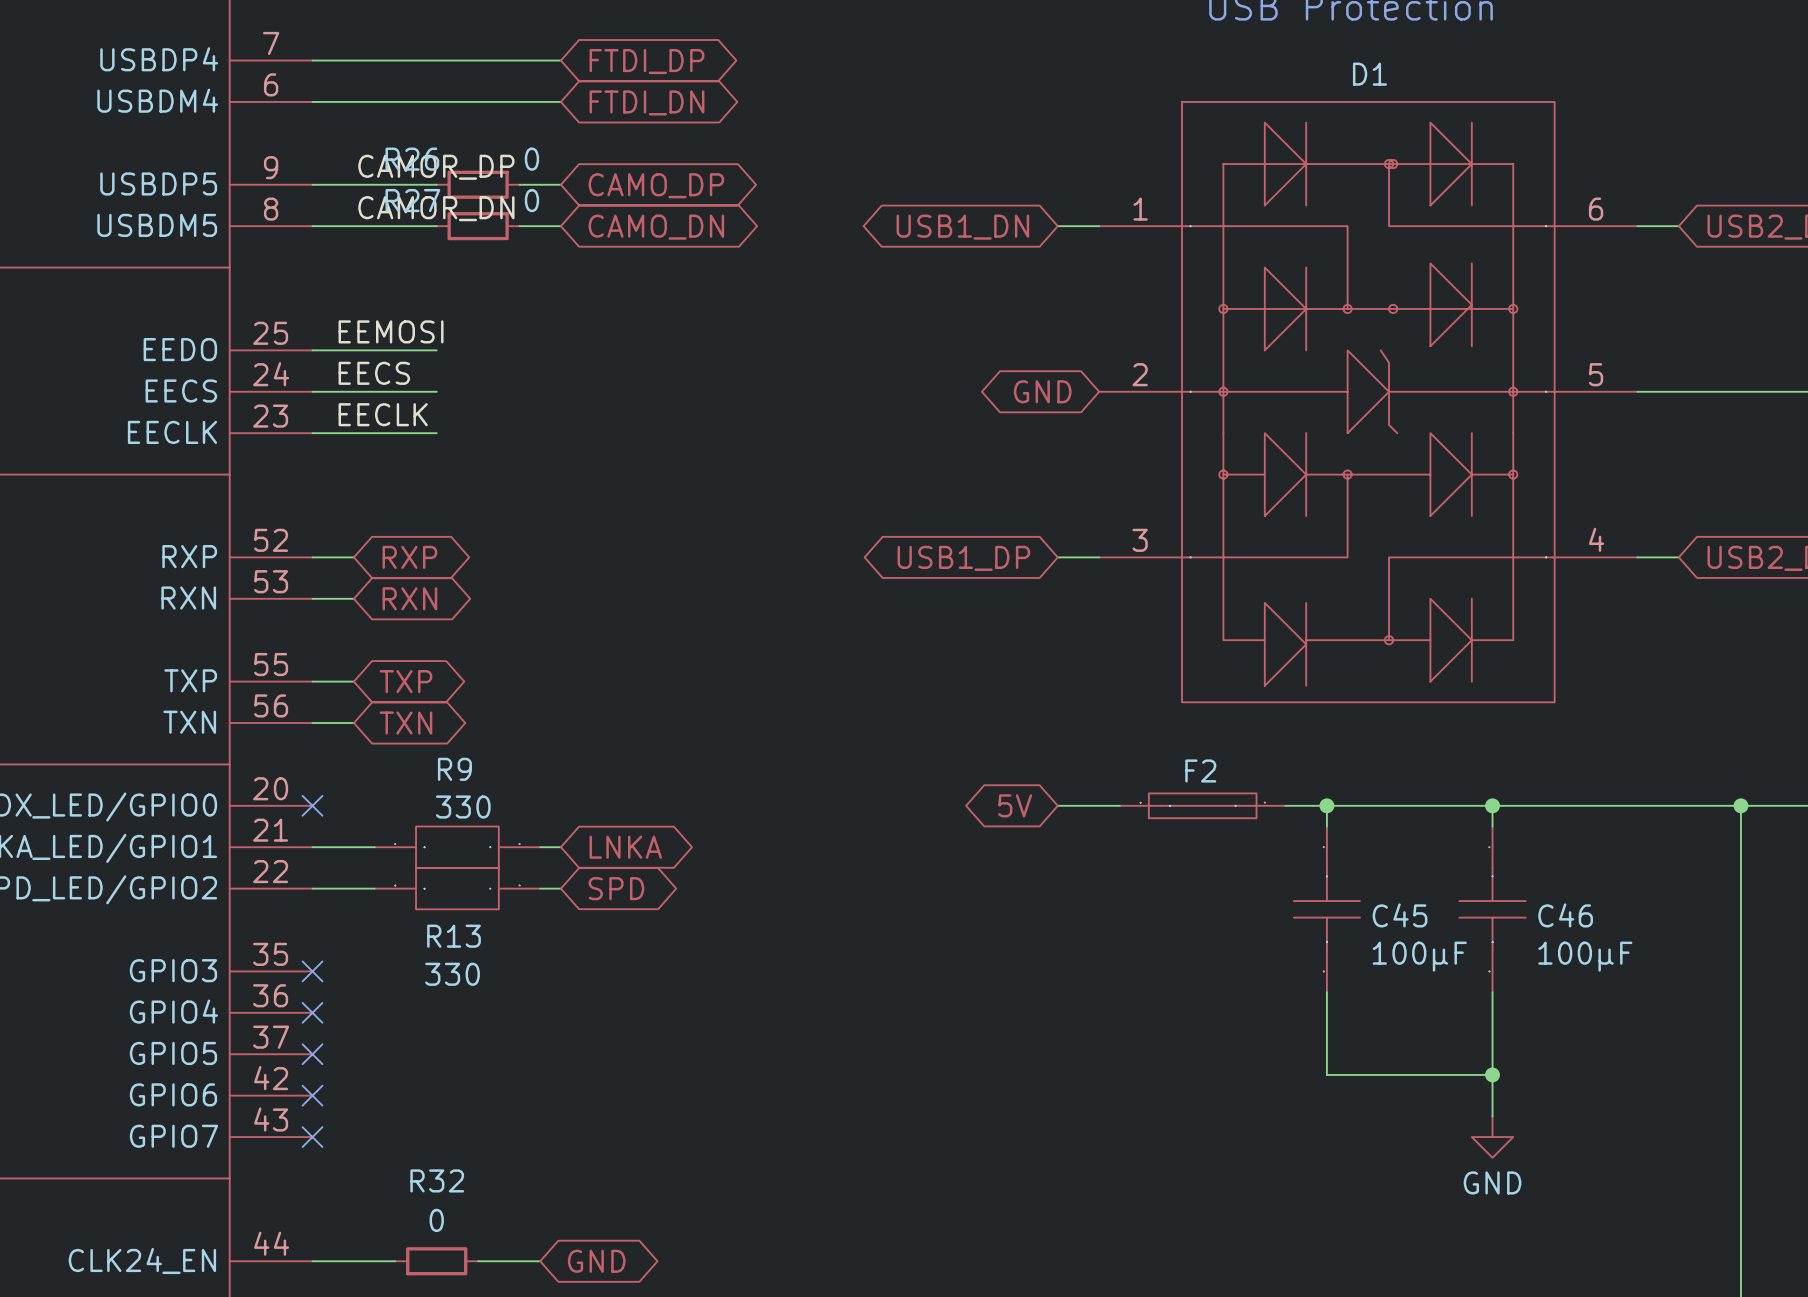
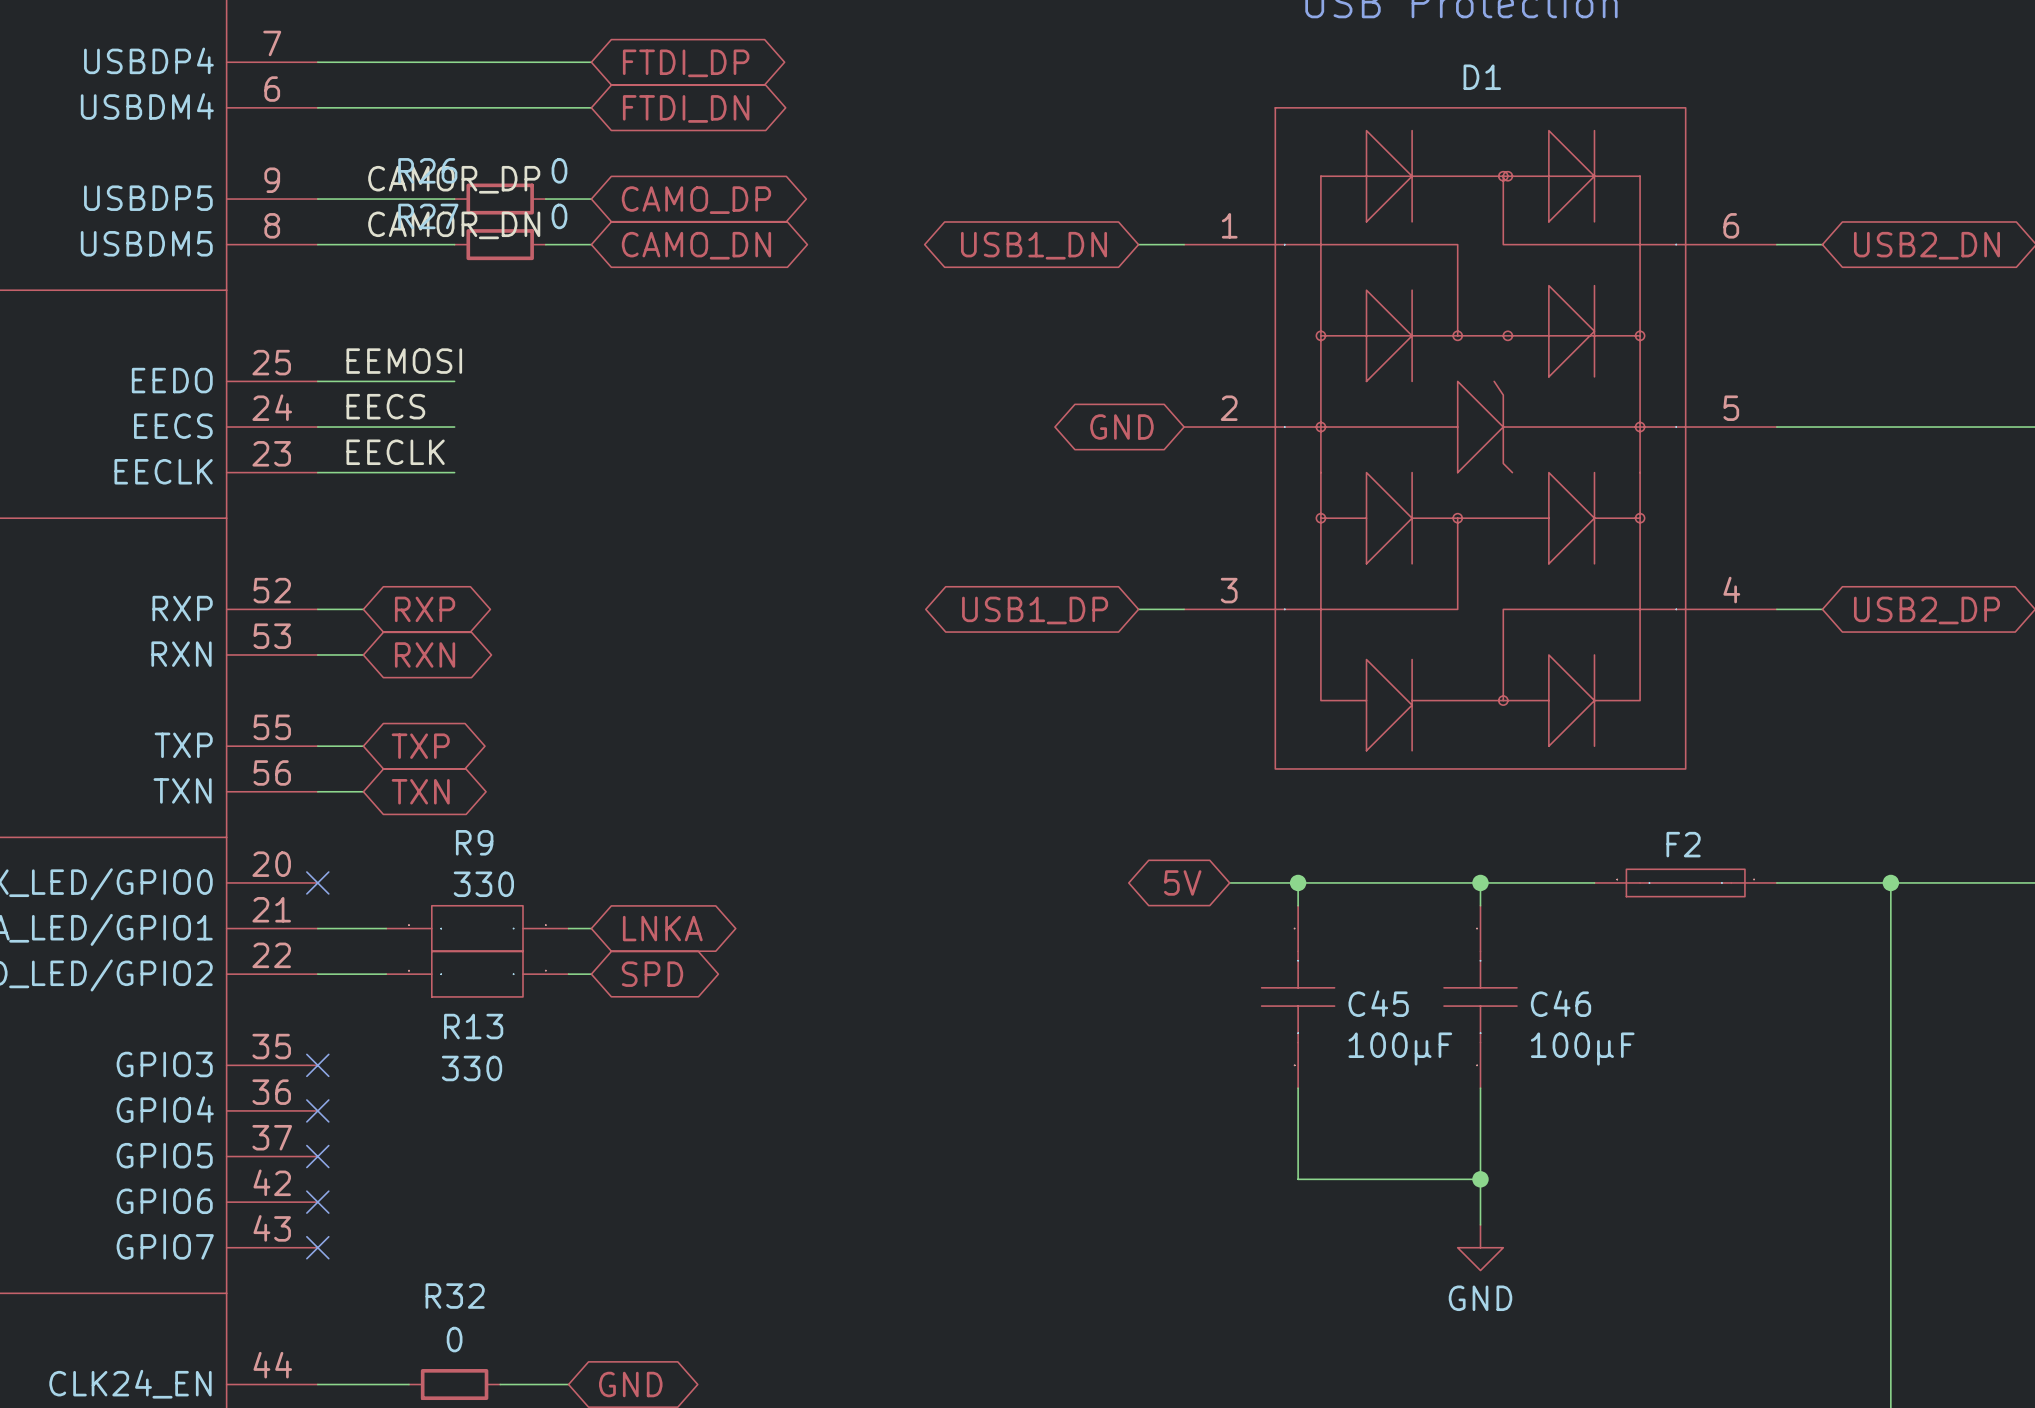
global label position: 5V (1015, 805) -> 5V (1182, 882)
wire: (1057, 805) (1119, 805) -> none
junction: none -> (1298, 882)
F2 position: (1202, 805) -> (1685, 882)
wire: (1326, 805) (1326, 826) -> (1298, 882) (1298, 905)
junction position: (1326, 805) -> (1480, 882)
wire: (1492, 805) (1492, 826) -> (1480, 882) (1480, 905)
junction: (1492, 805) -> none
C45 position: (1326, 909) -> (1298, 996)
C46 position: (1492, 909) -> (1480, 996)
wire: (1326, 992) (1326, 1074) -> (1298, 1088) (1298, 1179) (1434, 1179)
wire: (1492, 992) (1492, 1116) -> (1480, 1088) (1480, 1224)
wire: (1368, 1074) (1492, 1074) -> none
junction: none -> (1480, 1179)
junction: (1492, 1074) -> none
power symbol position: GND (1492, 1137) -> GND (1480, 1247)

